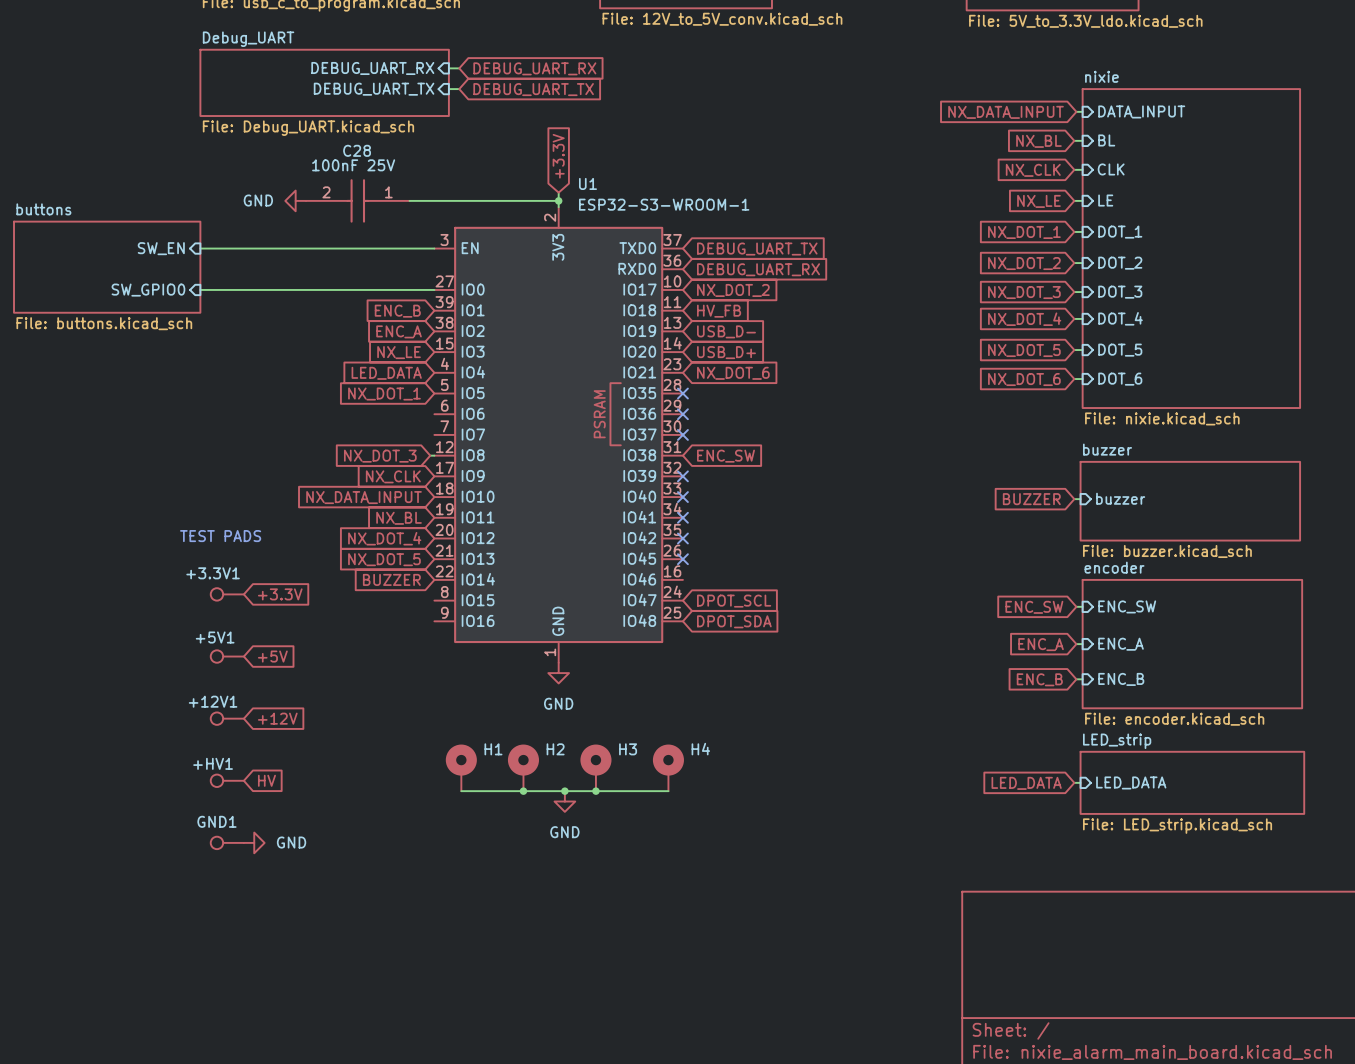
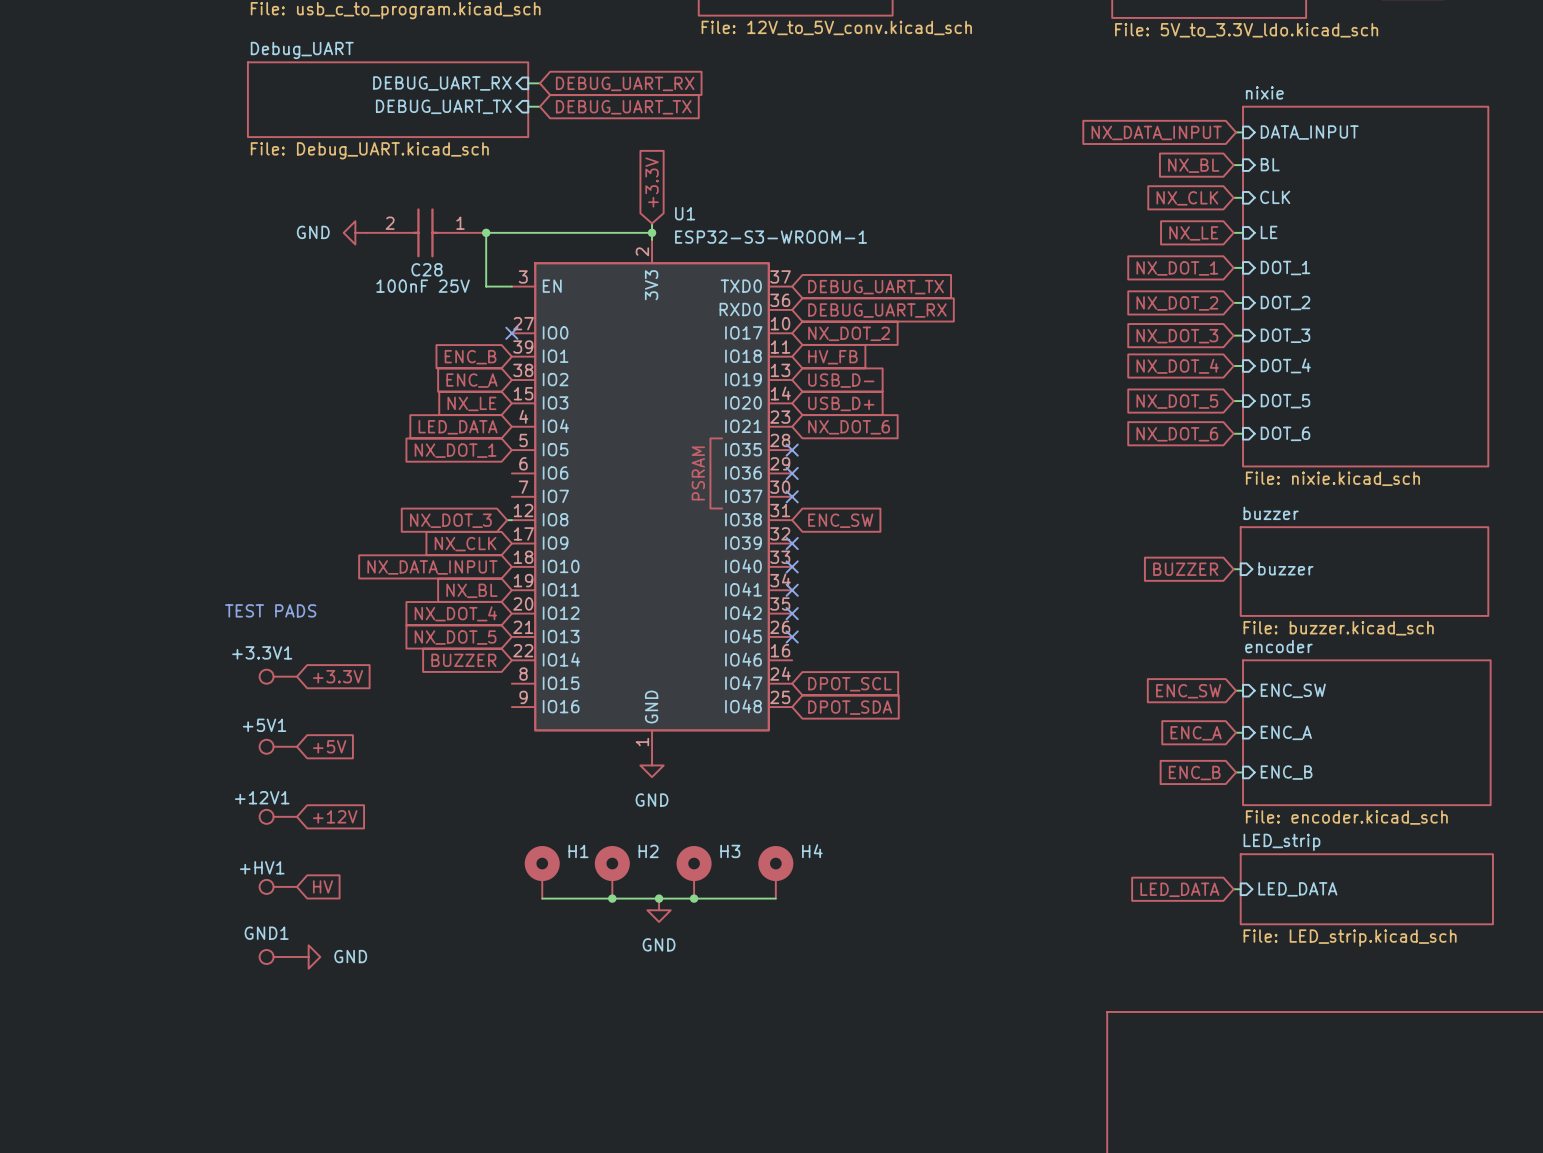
C28 name position: C28 (357, 150) -> C28 (426, 269)
C28 value position: 100nF 25V (353, 165) -> 100nF 25V (423, 286)
junction: none -> (486, 232)
sheet pin: SW_EN (161, 248) -> none
wire: (200, 248) (411, 248) -> (486, 232) (486, 286)
sheet buttons: File: buttons.kicad_sch (107, 267) -> none
wire: (200, 289) (434, 289) -> none
no-connect mark: none -> (511, 333)
sheet pin: SW_GPIO0 (148, 290) -> none

